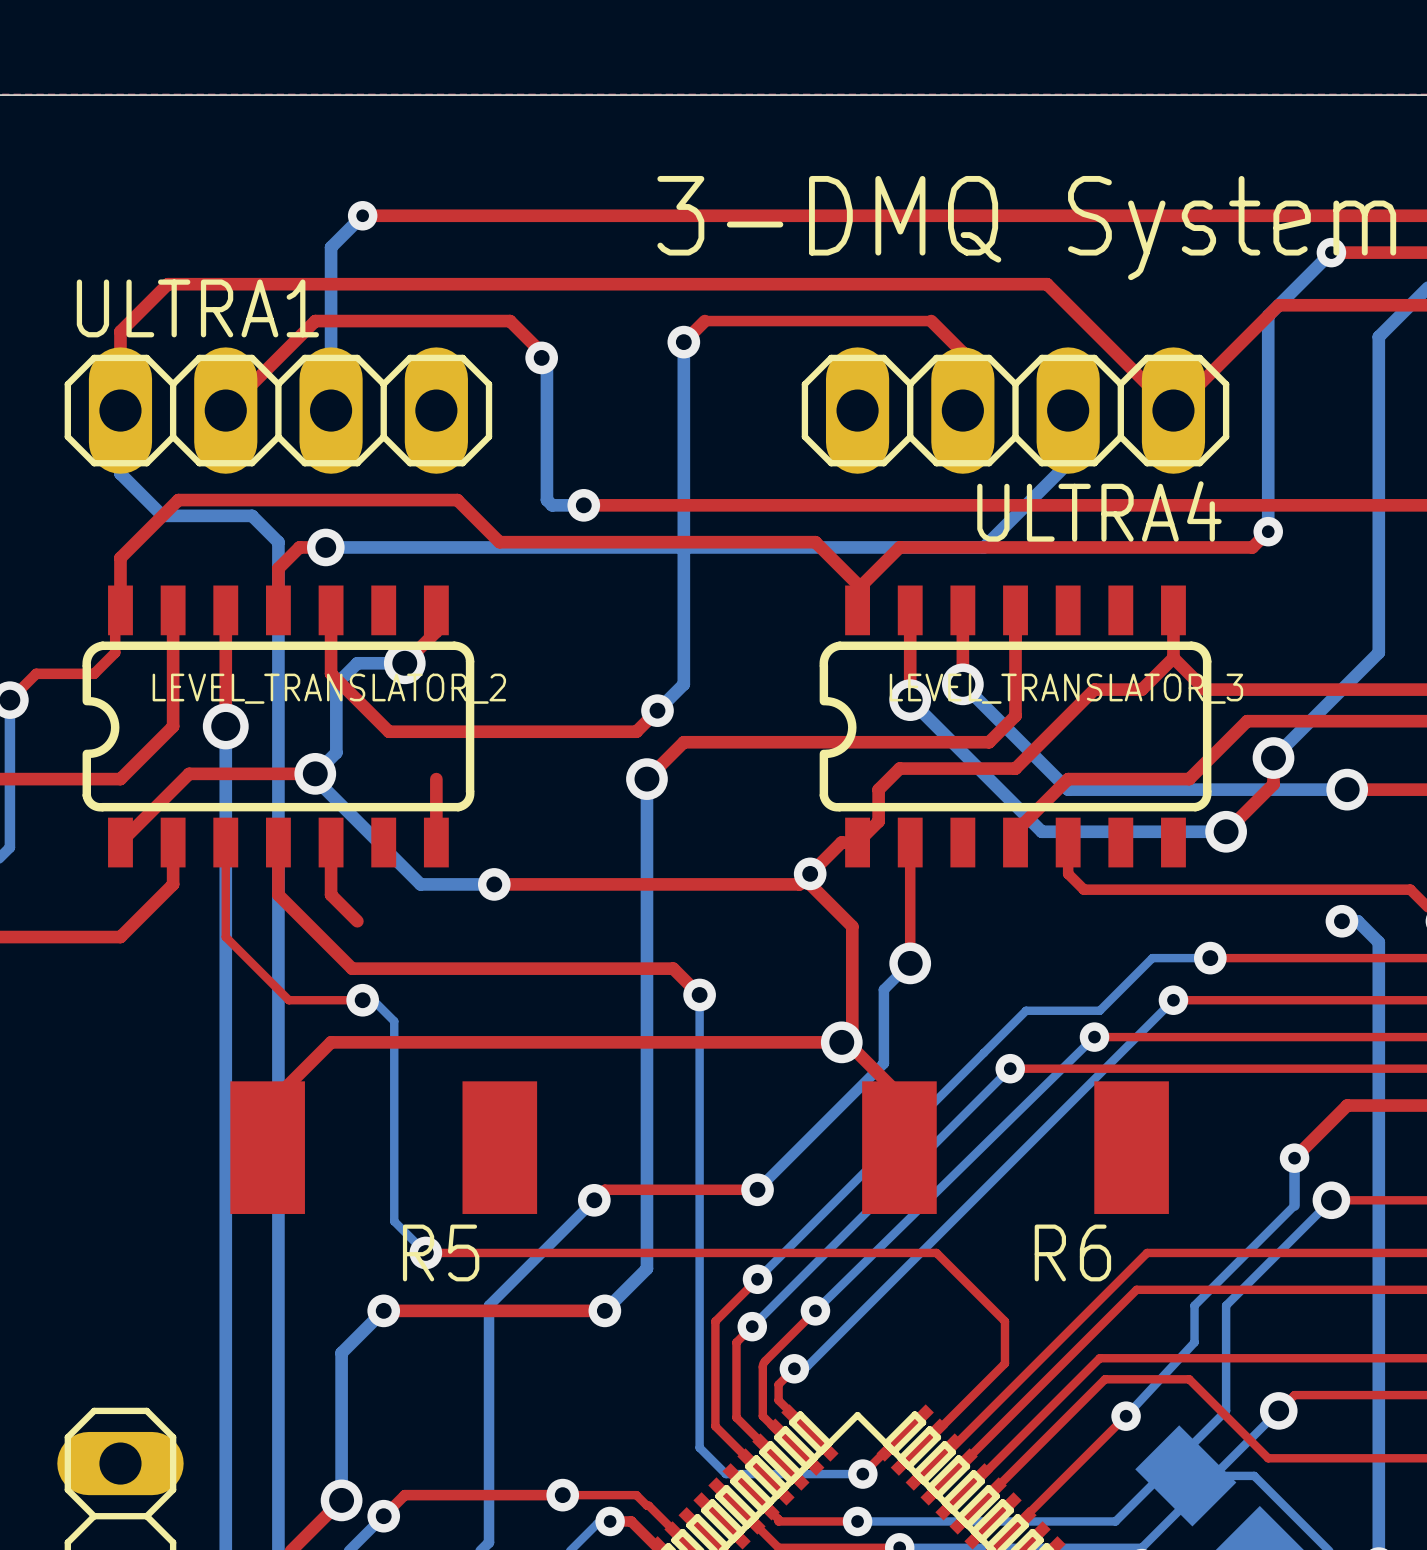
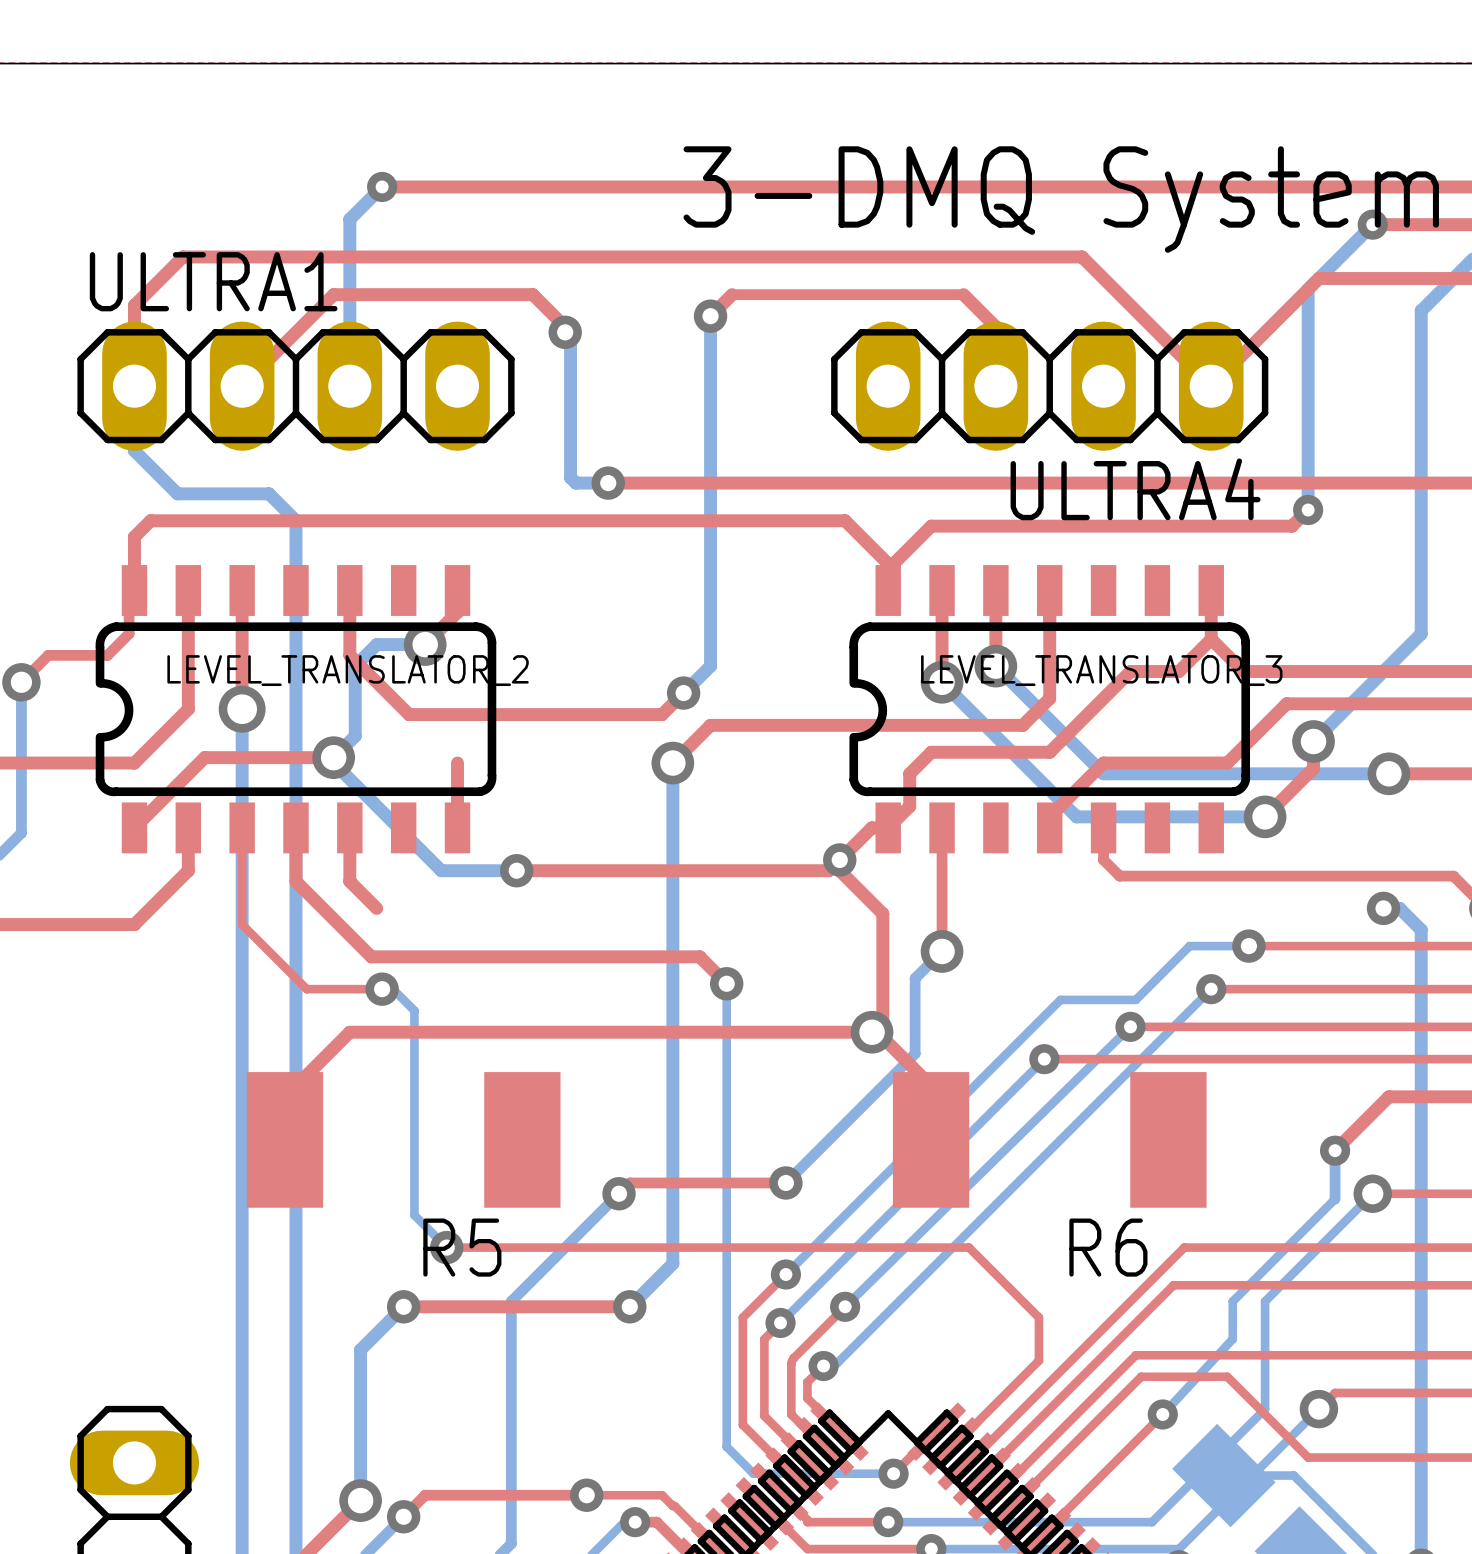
bottom track: (1068, 410) (1068, 463) (983, 547) (325, 547) -> none
top track: (136, 542) (178, 500) (457, 500) (499, 542) -> (150, 520) (522, 520)
top track: (325, 547) (299, 547) (278, 568) (278, 610) -> none
via: (325, 547) -> none

